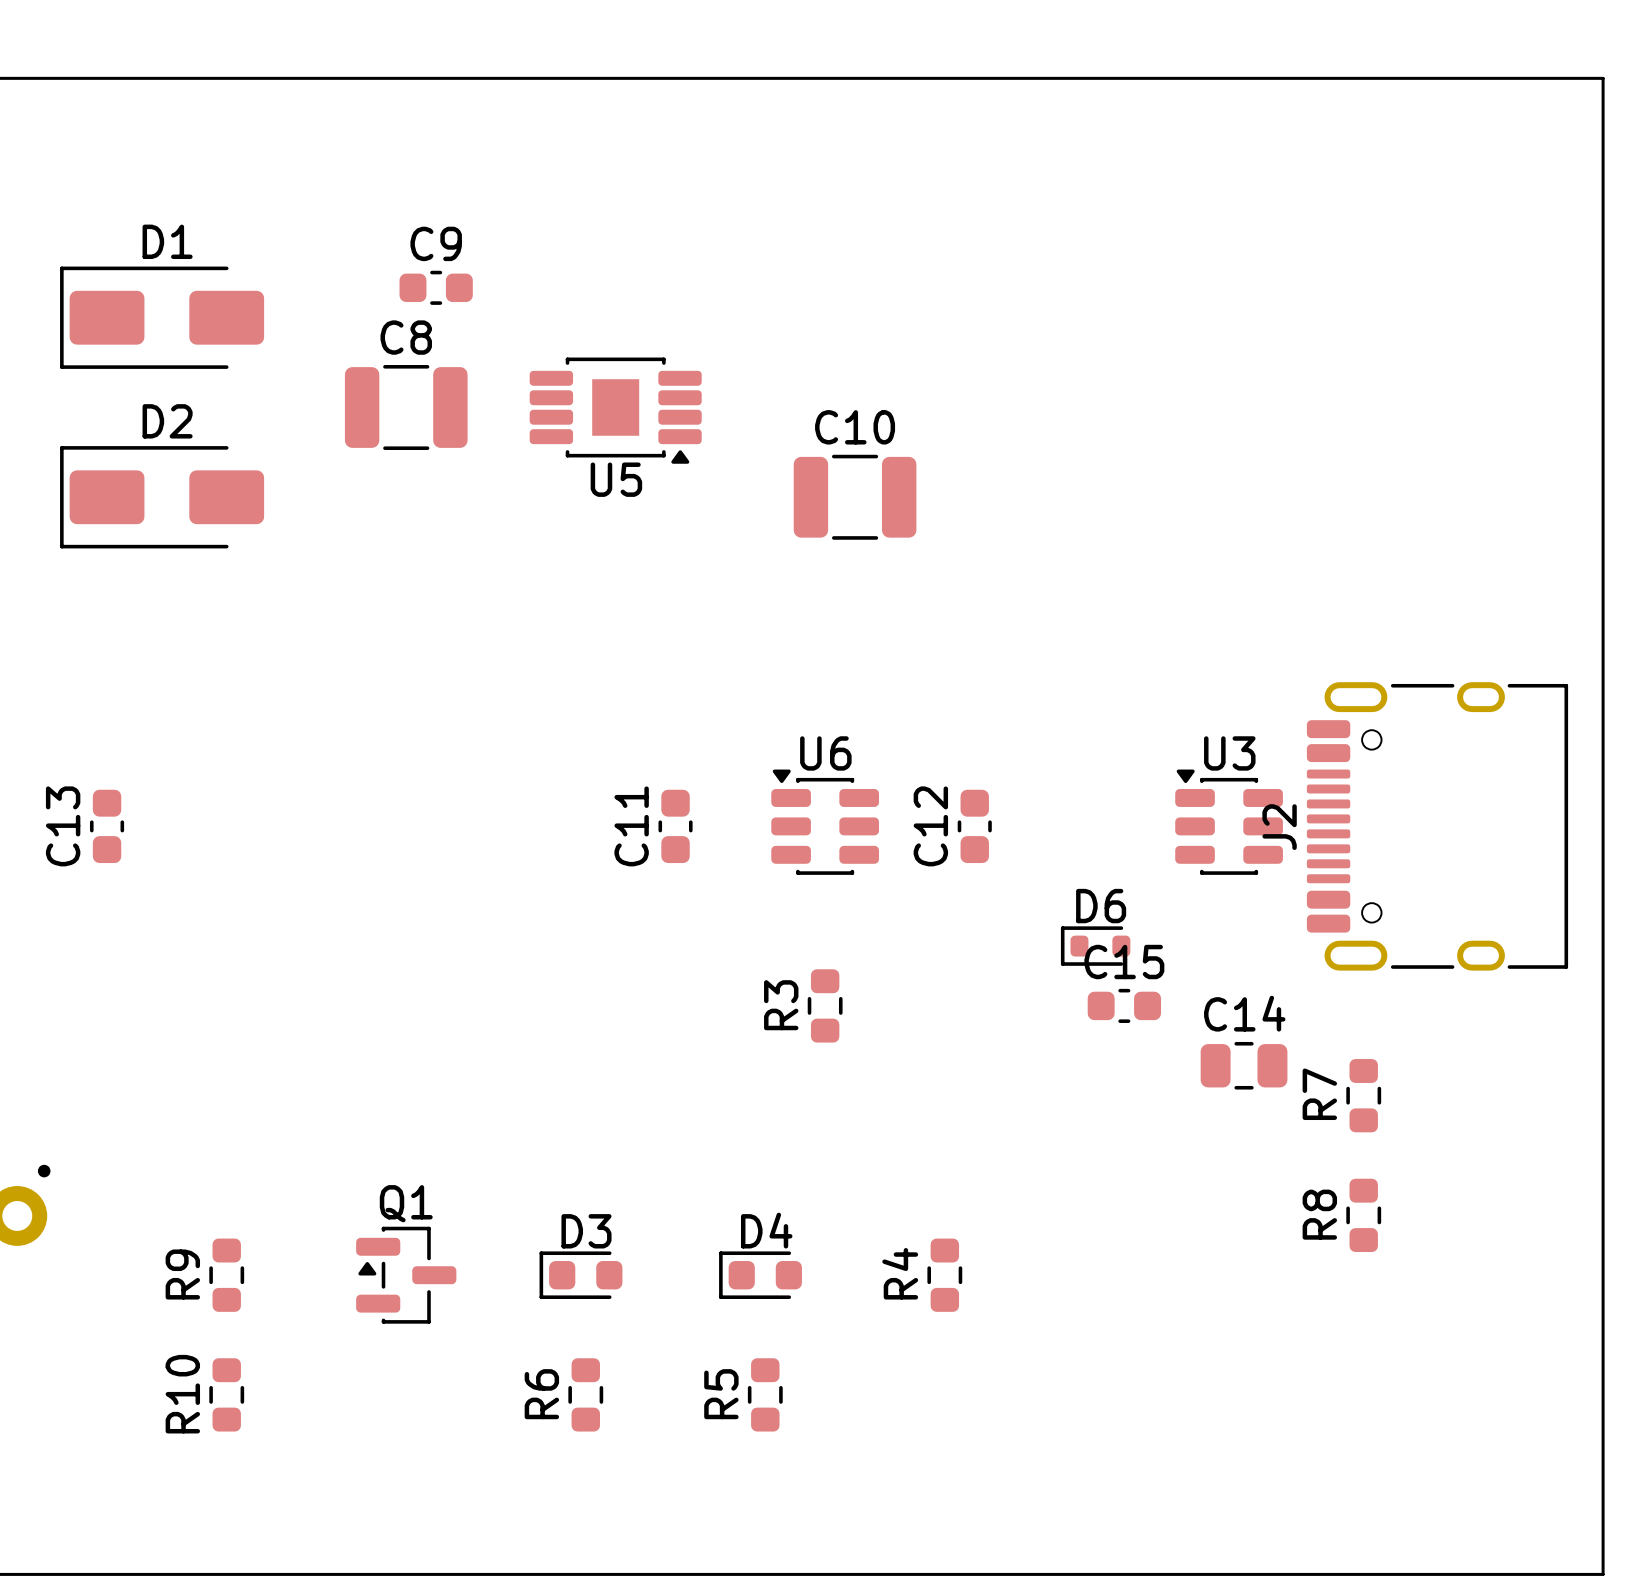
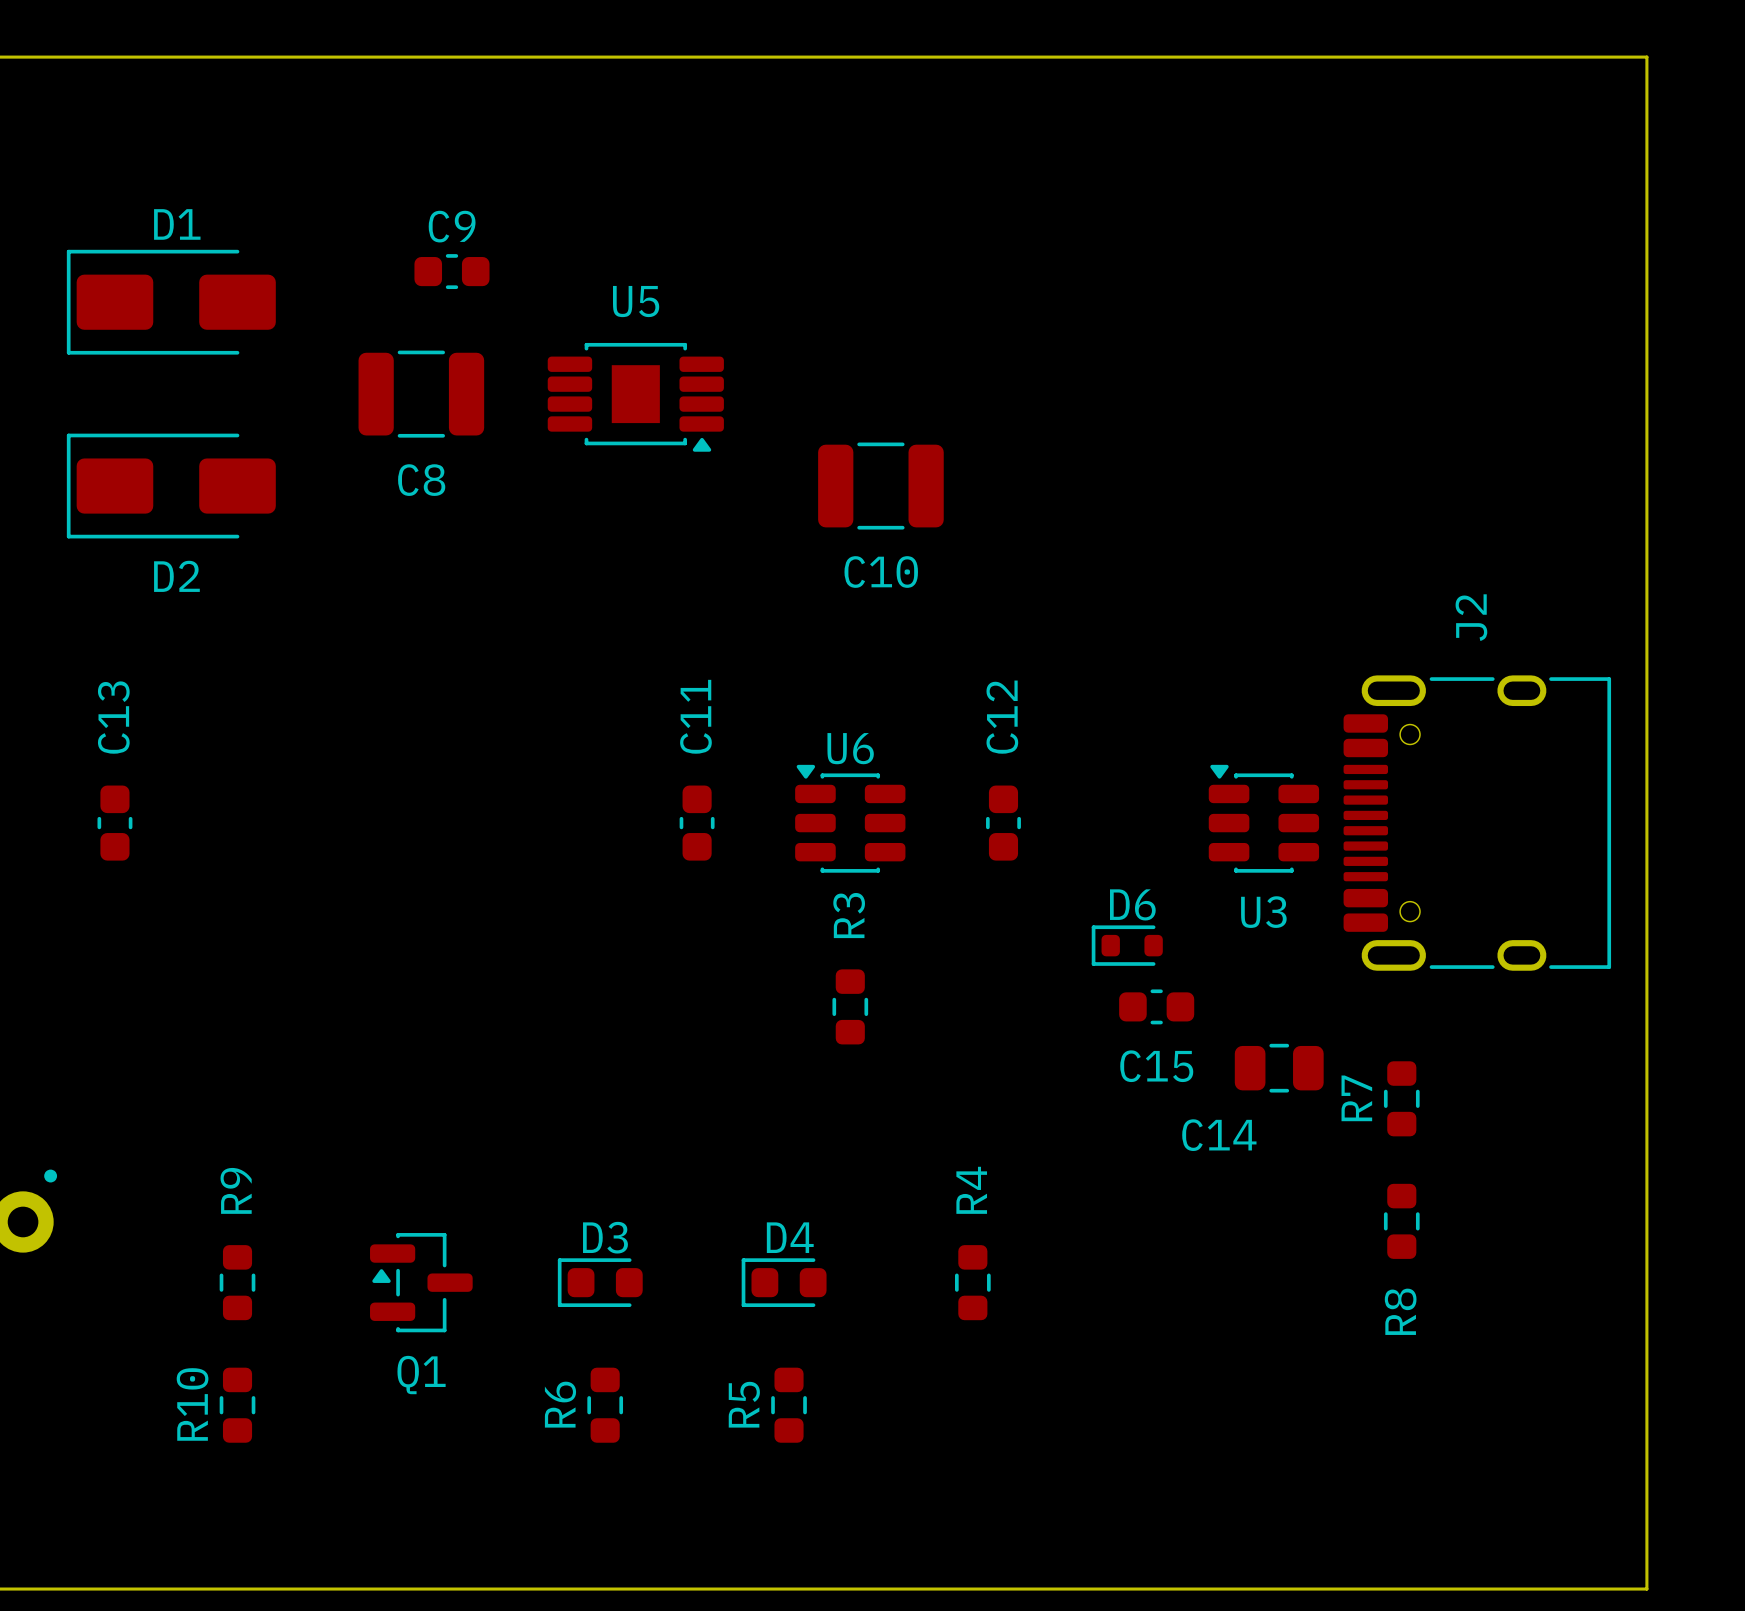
C8 name position: C8 (406, 337) -> C8 (421, 480)
D2 name position: D2 (167, 421) -> D2 (176, 576)
C10 name position: C10 (855, 427) -> C10 (881, 572)
U5 name position: U5 (616, 479) -> U5 (636, 301)
U3 name position: U3 (1229, 753) -> U3 (1263, 912)
C13 name position: C13 (63, 826) -> C13 (113, 717)
C11 name position: C11 (631, 826) -> C11 (695, 716)
C12 name position: C12 (930, 826) -> C12 (1002, 717)
J2 name position: J2 (1279, 827) -> J2 (1471, 617)
C15 name position: C15 (1124, 962) -> C15 (1156, 1066)
R3 name position: R3 (781, 1005) -> R3 (849, 915)
C14 name position: C14 (1244, 1013) -> C14 (1219, 1135)
Q1 name position: Q1 (406, 1203) -> Q1 (421, 1375)
R8 name position: R8 (1319, 1214) -> R8 (1400, 1311)
R4 name position: R4 (900, 1273) -> R4 (971, 1190)
R9 name position: R9 (182, 1274) -> R9 (236, 1190)

